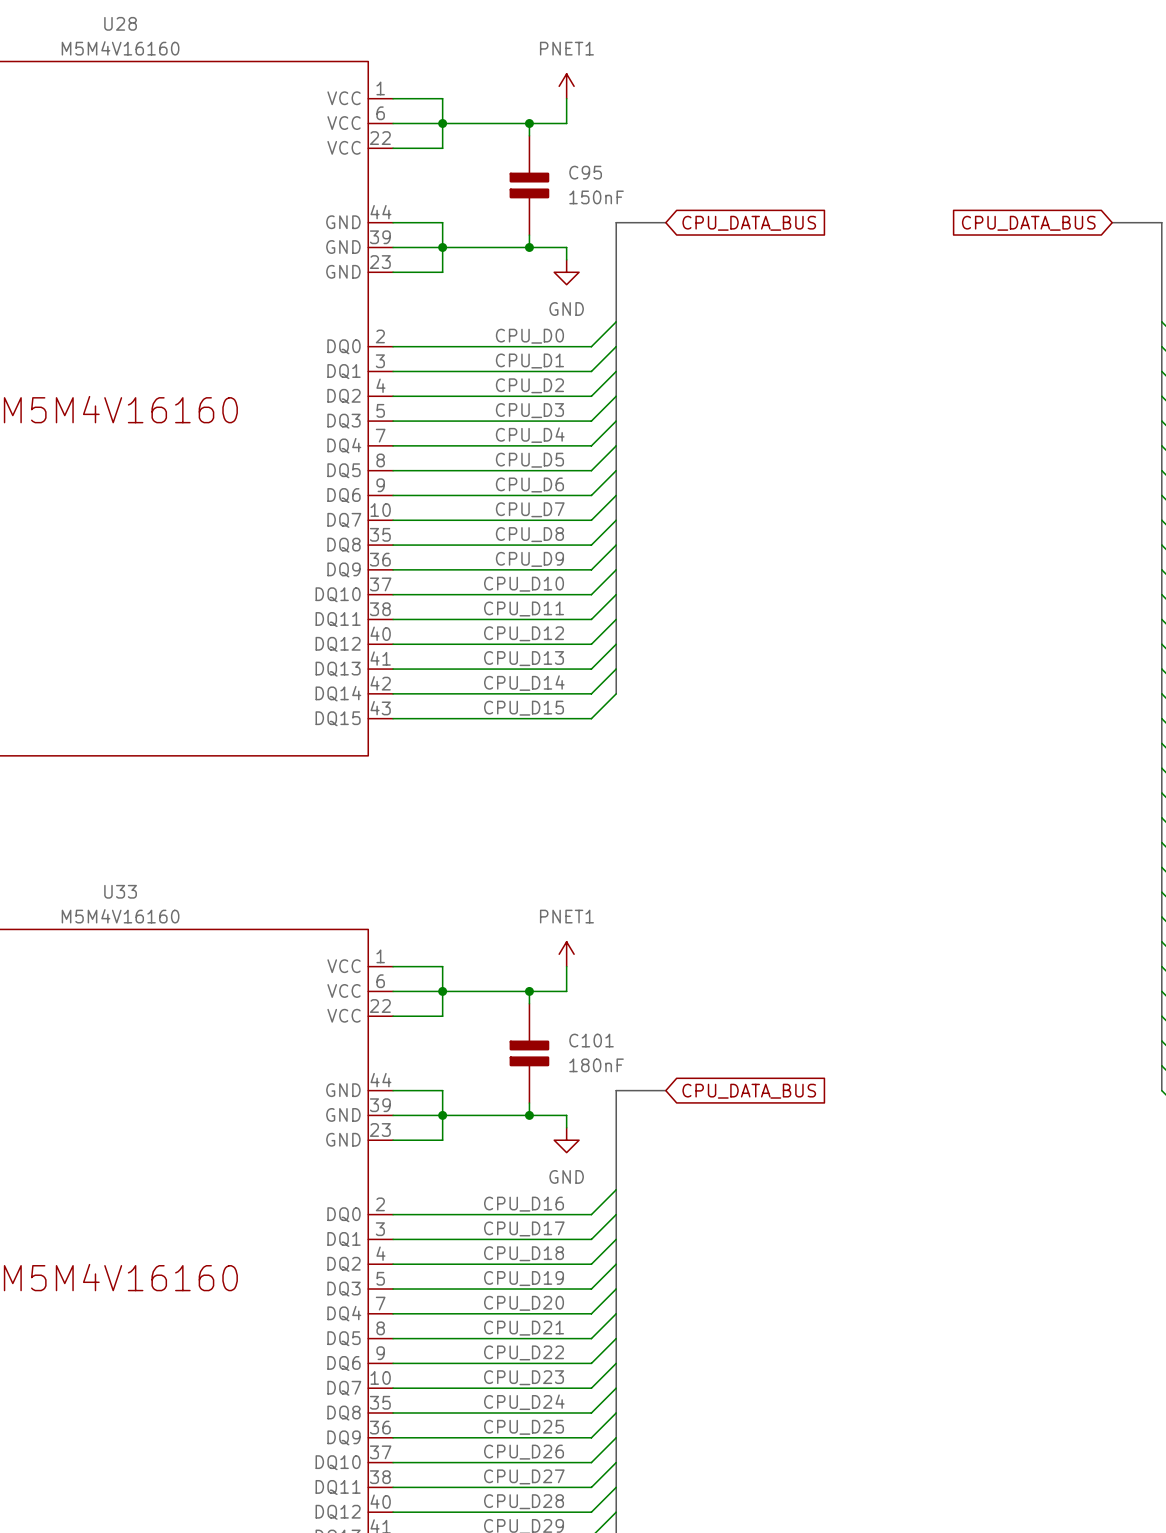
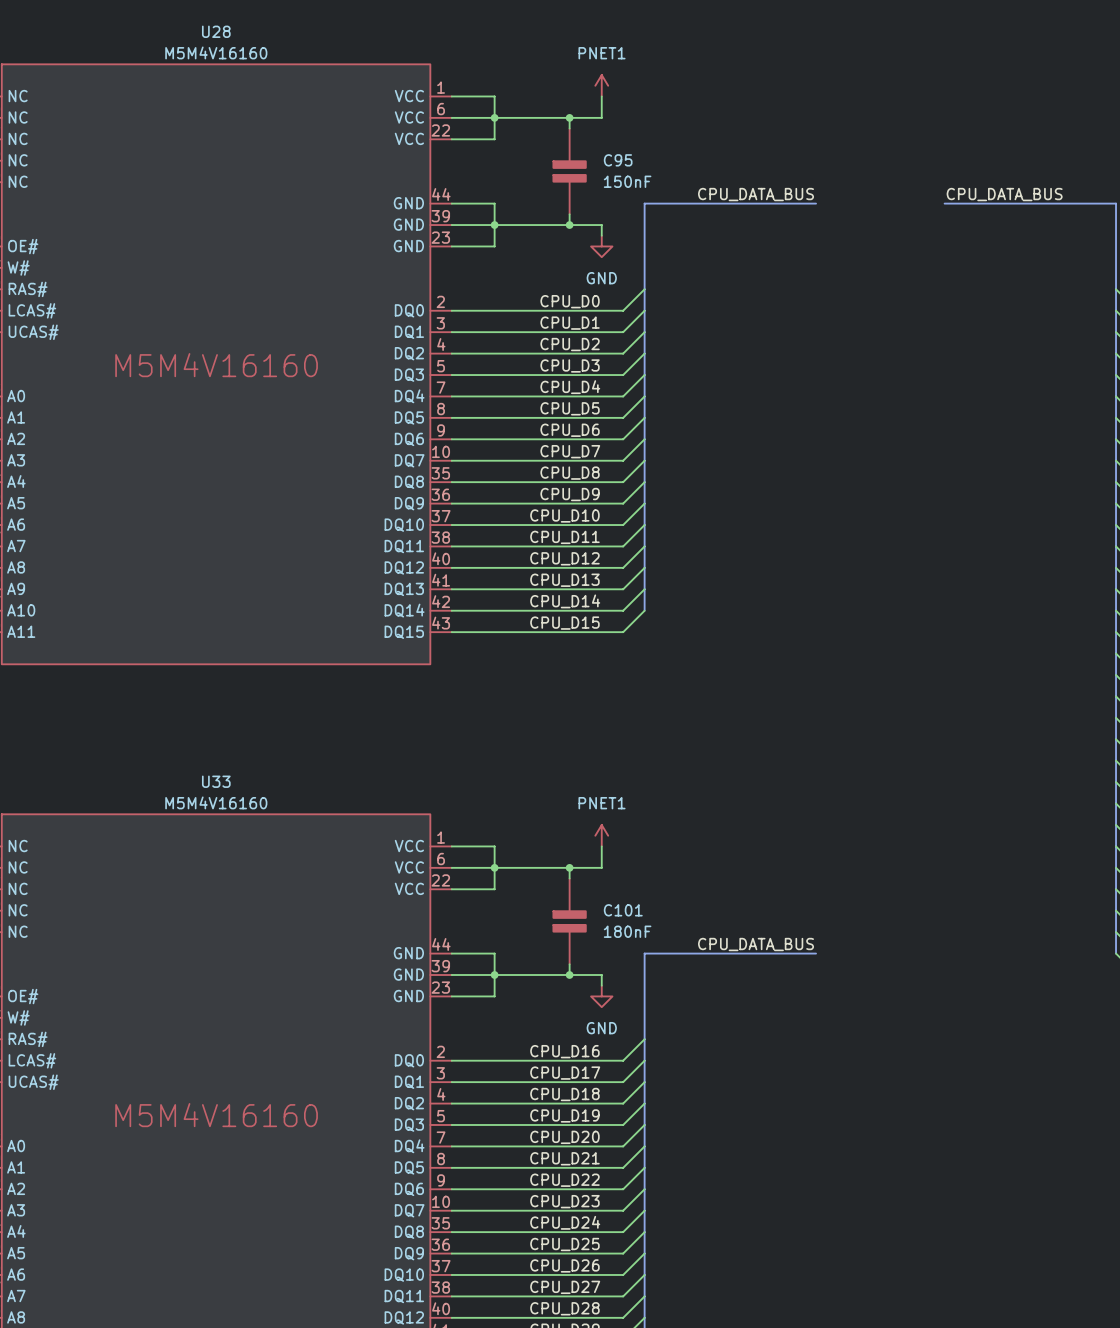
label: none -> CPU_DATA_BUS (756, 194)
label: none -> CPU_DATA_BUS (1004, 194)
bus: none -> (687, 203) (816, 203)
bus: none -> (944, 203) (1073, 203)
global label: CPU_DATA_BUS (749, 223) -> none
global label: CPU_DATA_BUS (1028, 223) -> none
label: none -> CPU_DATA_BUS (756, 944)
bus: none -> (687, 953) (816, 953)
global label: CPU_DATA_BUS (749, 1091) -> none

